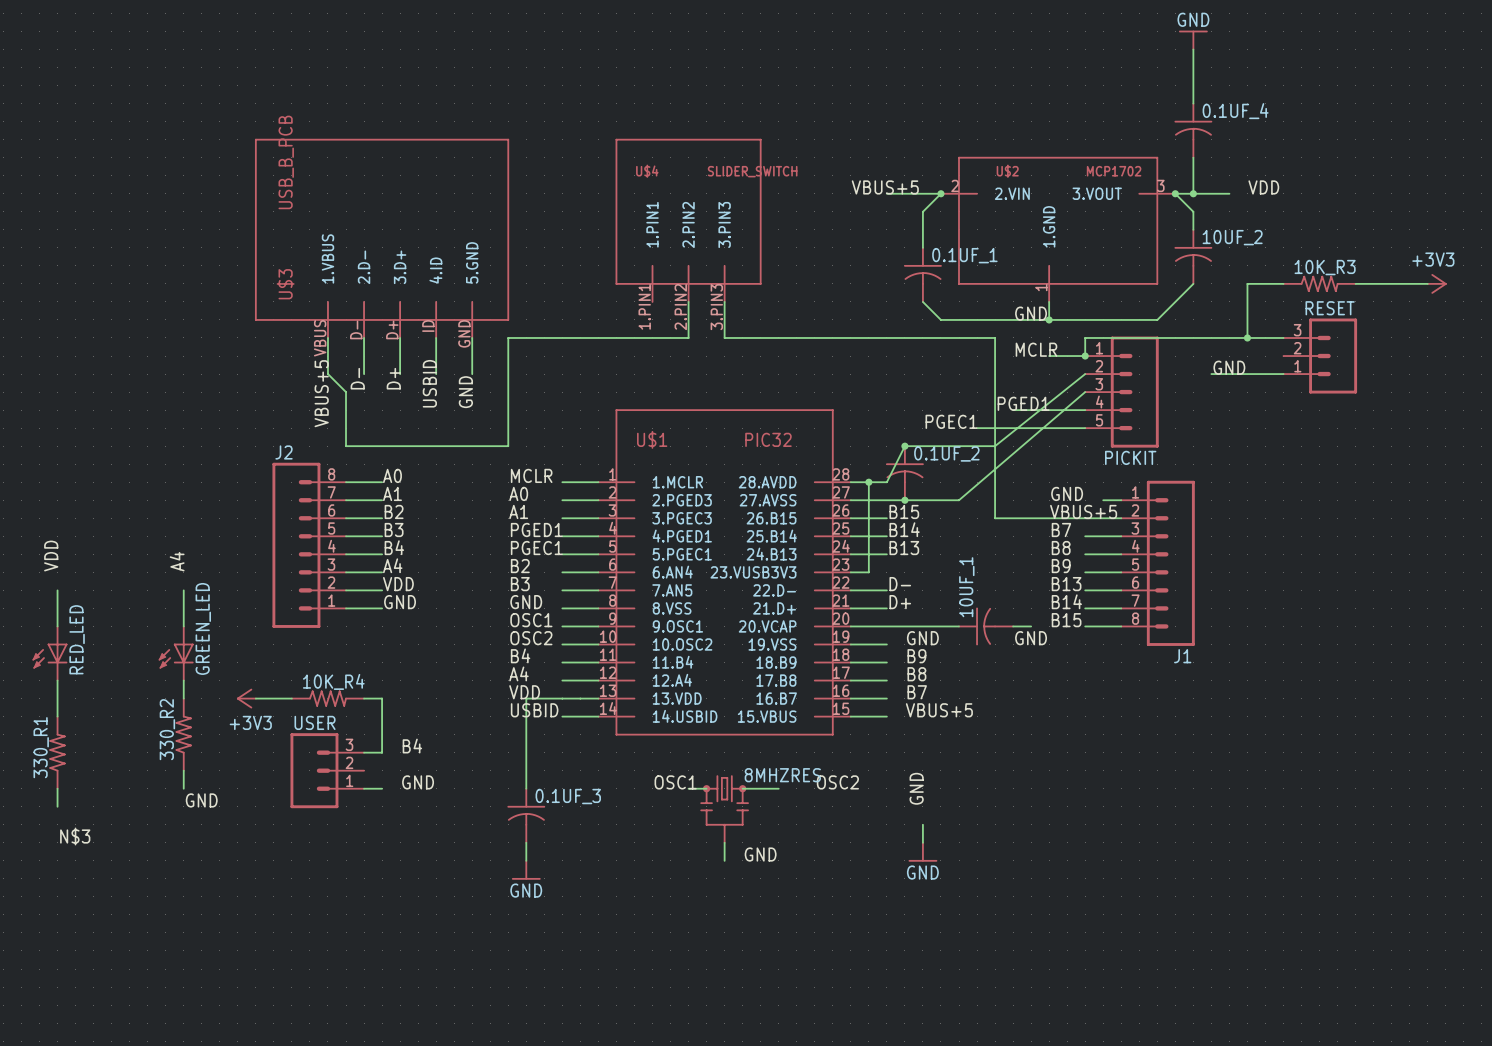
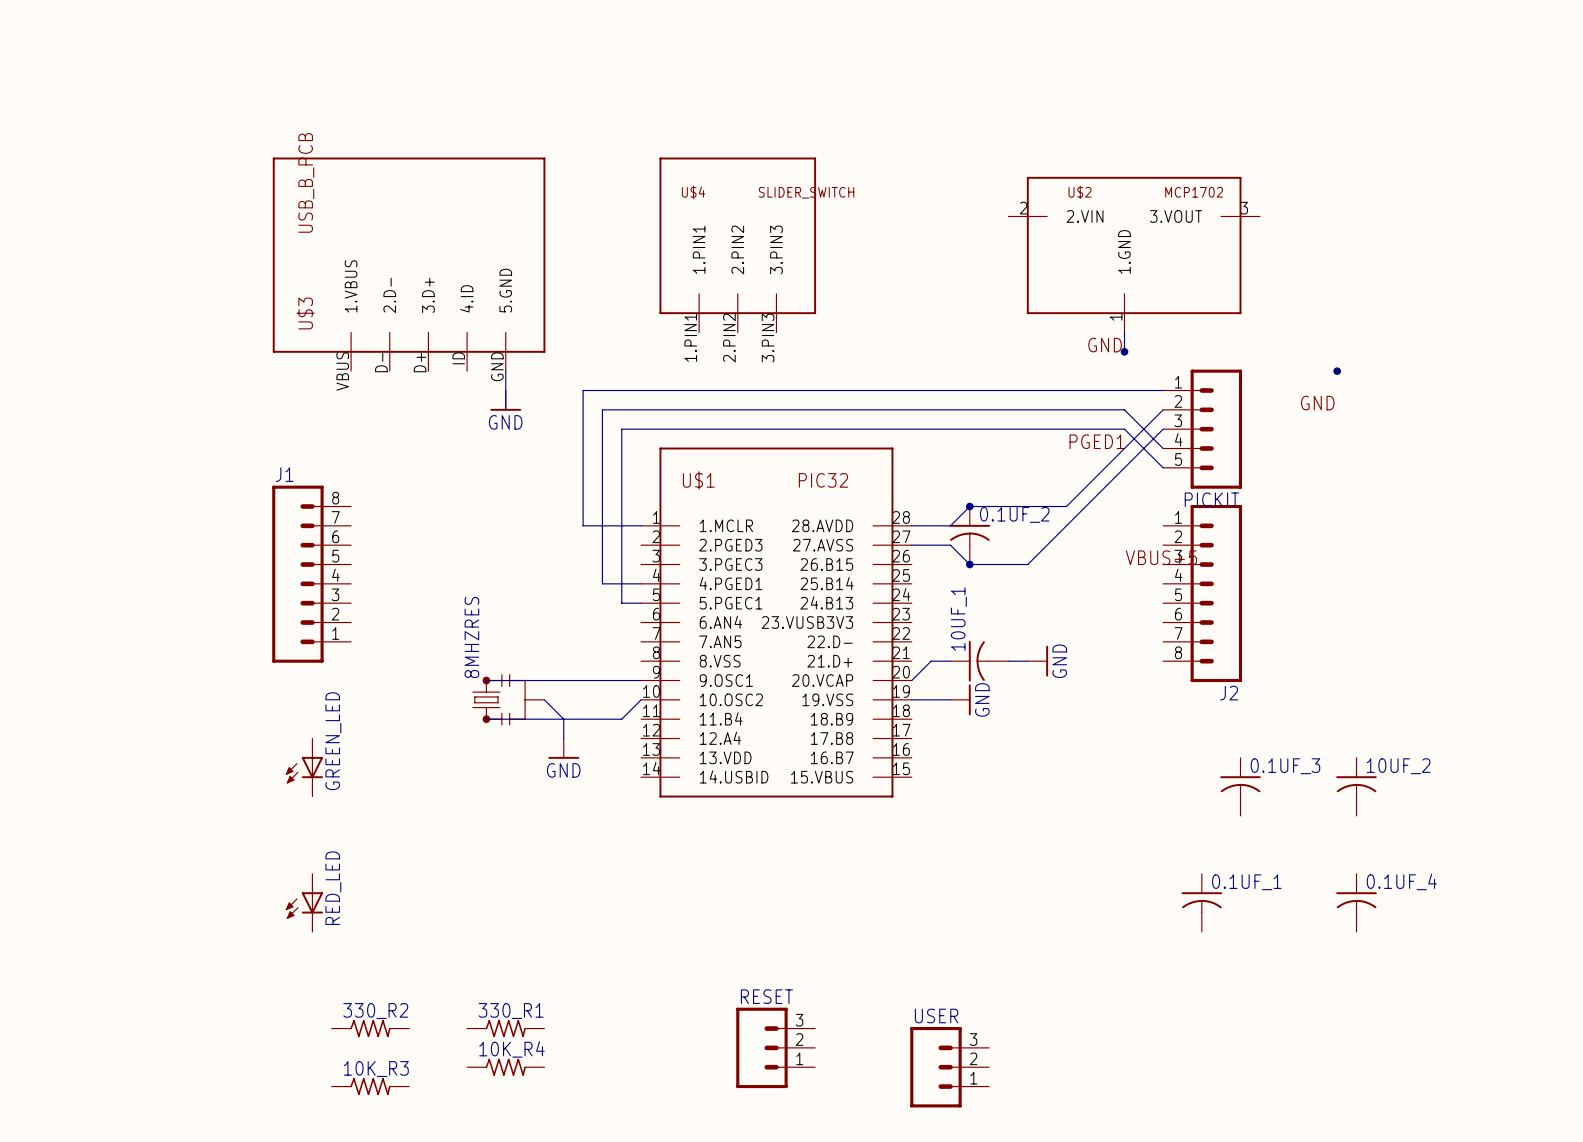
power symbol: GND (1193, 40) -> none
wire: (1193, 49) (1193, 103) -> none
0.1UF_4 position: (1193, 130) -> (1356, 902)
wire: (1193, 157) (1193, 193) -> none
label: VBUS+5 (885, 187) -> none
label: VDD (1263, 187) -> none
wire: (886, 193) (940, 193) (922, 211) (922, 247) -> none
junction: (940, 193) -> none
junction: (1175, 193) -> none
junction: (1193, 193) -> none
wire: (1229, 193) (1175, 193) (1193, 211) (1193, 229) -> none
10UF_2 position: (1193, 256) -> (1356, 786)
0.1UF_1 position: (922, 274) -> (1201, 902)
wire: (1193, 283) (1157, 319) (940, 319) (922, 301) -> none
wire: (1283, 283) (1247, 283) (1247, 337) -> none
10K_R3 position: (1319, 283) -> (370, 1086)
wire: (1355, 283) (1427, 283) -> none
power symbol: +3V3 (1437, 283) -> none
wire: (688, 301) (688, 337) (508, 337) (508, 446) (346, 446) (346, 392) (327, 374) (327, 337) -> none
wire: (724, 301) (724, 337) (995, 337) (995, 518) (1121, 518) -> none
wire: (364, 337) (364, 374) -> none
wire: (400, 337) (400, 374) -> none
wire: (436, 337) (436, 374) -> none
wire: (1283, 337) (1085, 337) (1085, 356) -> none
label: MCLR (1036, 349) -> none
wire: none -> (1124, 390) (583, 390) (583, 525) (602, 525)
junction: (1085, 356) -> none
RESET: (1320, 356) -> none
power symbol: none -> GND (505, 400)
wire: (1085, 374) (995, 446) (904, 446) (886, 482) -> (1163, 409) (1066, 506) (969, 506) (950, 525)
wire: (1211, 374) (1283, 374) -> none
label: D- (357, 378) -> none
label: D+ (393, 378) -> none
label: USBID (429, 383) -> none
label: GND (465, 392) -> none
wire: (1085, 392) (959, 500) (886, 500) -> (1163, 429) (1027, 564) (969, 564) (950, 545)
label: VBUS+5 (321, 393) -> none
wire: (1013, 410) (1085, 410) -> (602, 583) (602, 409) (1124, 409) (1163, 448)
label: PGEC1 (951, 421) -> none
wire: (977, 428) (1085, 428) -> (621, 603) (621, 429) (1124, 429) (1163, 467)
junction: (904, 446) -> none
junction: none -> (969, 506)
0.1UF_2 position: (904, 473) -> (969, 535)
label: A0 (392, 475) -> none
label: MCLR (531, 475) -> none
wire: (346, 482) (382, 482) -> none
wire: (868, 482) (868, 572) (850, 572) -> none
junction: (868, 482) -> none
label: A1 (392, 493) -> none
label: A0 (518, 493) -> none
label: GND (1067, 493) -> none
wire: (346, 500) (382, 500) -> none
wire: (562, 500) (598, 500) -> none
junction: (904, 500) -> none
label: B2 (394, 511) -> none
label: A1 (518, 511) -> none
label: B15 (904, 511) -> none
wire: (346, 518) (382, 518) -> none
wire: (562, 518) (598, 518) -> none
wire: (850, 518) (886, 518) -> none
junction: none -> (969, 564)
label: B14 (904, 529) -> none
label: B3 (394, 530) -> none
label: PGED1 (536, 530) -> none
label: B7 (1061, 530) -> none
wire: (346, 536) (382, 536) -> none
wire: (850, 536) (886, 536) -> none
J2 rotation: 0° (296, 545) -> 180° (1216, 593)
J2 position: (309, 545) -> (1202, 593)
label: B4 (394, 547) -> none
label: PGEC1 (536, 548) -> none
label: B13 (904, 548) -> none
label: B8 (1061, 548) -> none
wire: (346, 554) (382, 554) -> none
wire: (562, 554) (580, 554) -> none
wire: (850, 554) (886, 554) -> none
label: VDD (51, 556) -> none
label: A4 (177, 561) -> none
J1 position: (1158, 563) -> (311, 574)
J1 rotation: 0° (1170, 563) -> 180° (297, 574)
label: A4 (392, 565) -> none
label: B2 (520, 566) -> none
label: B9 (1061, 566) -> none
wire: (346, 572) (382, 572) -> none
wire: (562, 572) (598, 572) -> none
label: VDD (398, 584) -> none
label: B3 (520, 584) -> none
label: D- (900, 584) -> none
label: B13 (1066, 584) -> none
wire: (57, 590) (57, 626) -> none
wire: (183, 590) (183, 626) -> none
wire: (346, 590) (382, 590) -> none
wire: (562, 590) (598, 590) -> none
wire: (850, 590) (886, 590) -> none
label: B14 (1066, 601) -> none
label: GND (400, 602) -> none
label: GND (526, 602) -> none
label: D+ (900, 602) -> none
wire: (346, 608) (382, 608) -> none
wire: (562, 608) (598, 608) -> none
wire: (850, 608) (868, 608) -> (911, 680) (931, 661)
power symbol: none -> GND (1037, 661)
label: OSC1 (531, 620) -> none
label: B15 (1066, 620) -> none
wire: none -> (486, 680) (602, 680)
wire: (850, 626) (959, 626) -> none
10UF_1 position: (986, 626) -> (979, 661)
wire: (1013, 626) (1031, 626) -> (1008, 661) (1027, 661)
wire: (1085, 626) (1121, 626) -> none
label: OSC2 (531, 638) -> none
label: GND (922, 638) -> none
label: GND (1031, 638) -> none
wire: none -> (544, 699) (563, 719) (563, 738)
wire: (562, 644) (598, 644) -> none
power symbol: none -> GND (960, 699)
RED_LED: (50, 653) -> none
GREEN_LED position: (176, 653) -> (304, 767)
label: B4 (520, 655) -> none
label: B9 (916, 656) -> none
wire: none -> (486, 719) (602, 719)
wire: (580, 662) (598, 662) -> (621, 719) (641, 699)
wire: (850, 662) (886, 662) -> none
label: A4 (518, 673) -> none
label: B8 (916, 674) -> none
wire: (57, 680) (57, 716) -> none
wire: (183, 680) (183, 698) -> none
wire: (562, 680) (598, 680) -> none
wire: (850, 680) (886, 680) -> none
power symbol: none -> GND (563, 748)
label: VDD (524, 692) -> none
label: B7 (917, 692) -> none
power symbol: +3V3 (246, 698) -> none
wire: (255, 698) (291, 698) -> none
10K_R4 position: (327, 698) -> (505, 1067)
wire: (364, 698) (382, 698) (382, 752) (364, 752) -> none
wire: (598, 698) (526, 698) (526, 788) -> none
wire: (850, 698) (886, 698) -> none
label: USBID (534, 710) -> none
label: VBUS+5 (939, 710) -> none
wire: (562, 716) (598, 716) -> none
wire: (850, 716) (886, 716) -> none
330_R2 rotation: 0° (183, 734) -> 90° clockwise (370, 1028)
330_R2 position: (183, 734) -> (370, 1028)
label: B4 (412, 746) -> none
330_R1 rotation: 0° (57, 752) -> 90° clockwise (505, 1028)
330_R1 position: (57, 752) -> (505, 1028)
wire: (183, 770) (183, 788) -> none
USER: (327, 770) -> none
label: GND (418, 782) -> none
label: OSC1 (675, 782) -> none
label: OSC2 (837, 782) -> none
wire: (57, 788) (57, 806) -> none
wire: (364, 788) (382, 788) -> none
wire: (688, 788) (706, 788) -> none
wire: (742, 788) (778, 788) -> none
label: GND (916, 788) -> none
label: GND (201, 800) -> none
8MHZRES rotation: 0° (724, 809) -> 90° counterclockwise (508, 699)
8MHZRES position: (724, 809) -> (508, 699)
0.1UF_3 position: (526, 815) -> (1240, 786)
wire: (922, 824) (922, 842) -> none
RED_LED: none -> (304, 902)
label: N$3 (75, 836) -> none
wire: (526, 842) (526, 860) -> none
wire: (724, 842) (724, 860) -> none
power symbol: GND (922, 852) -> none
label: GND (760, 854) -> none
power symbol: GND (526, 870) -> none
RESET: none -> (775, 1047)
USER: none -> (949, 1067)

